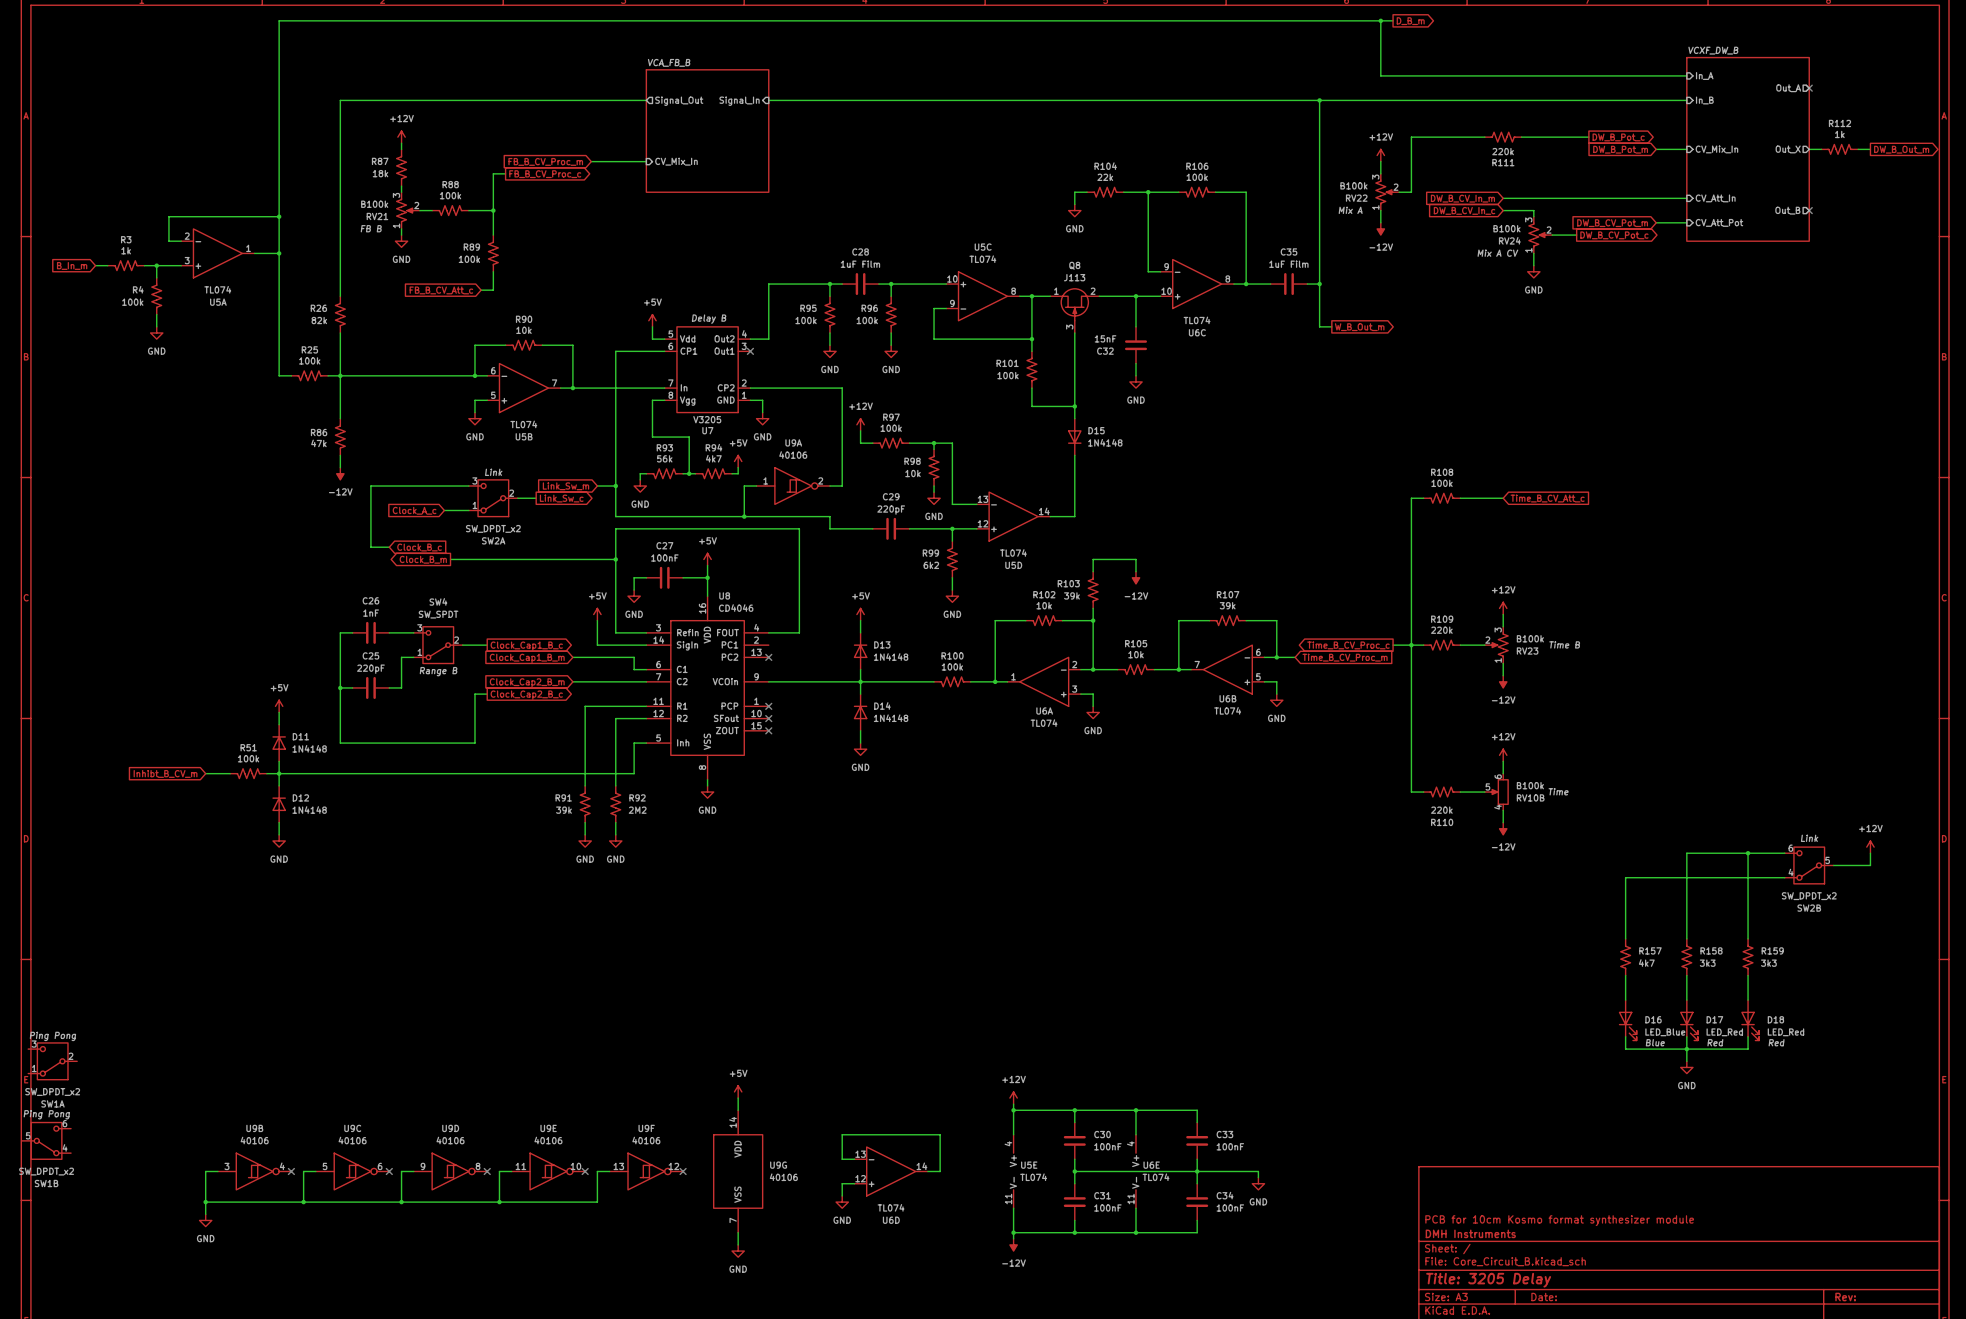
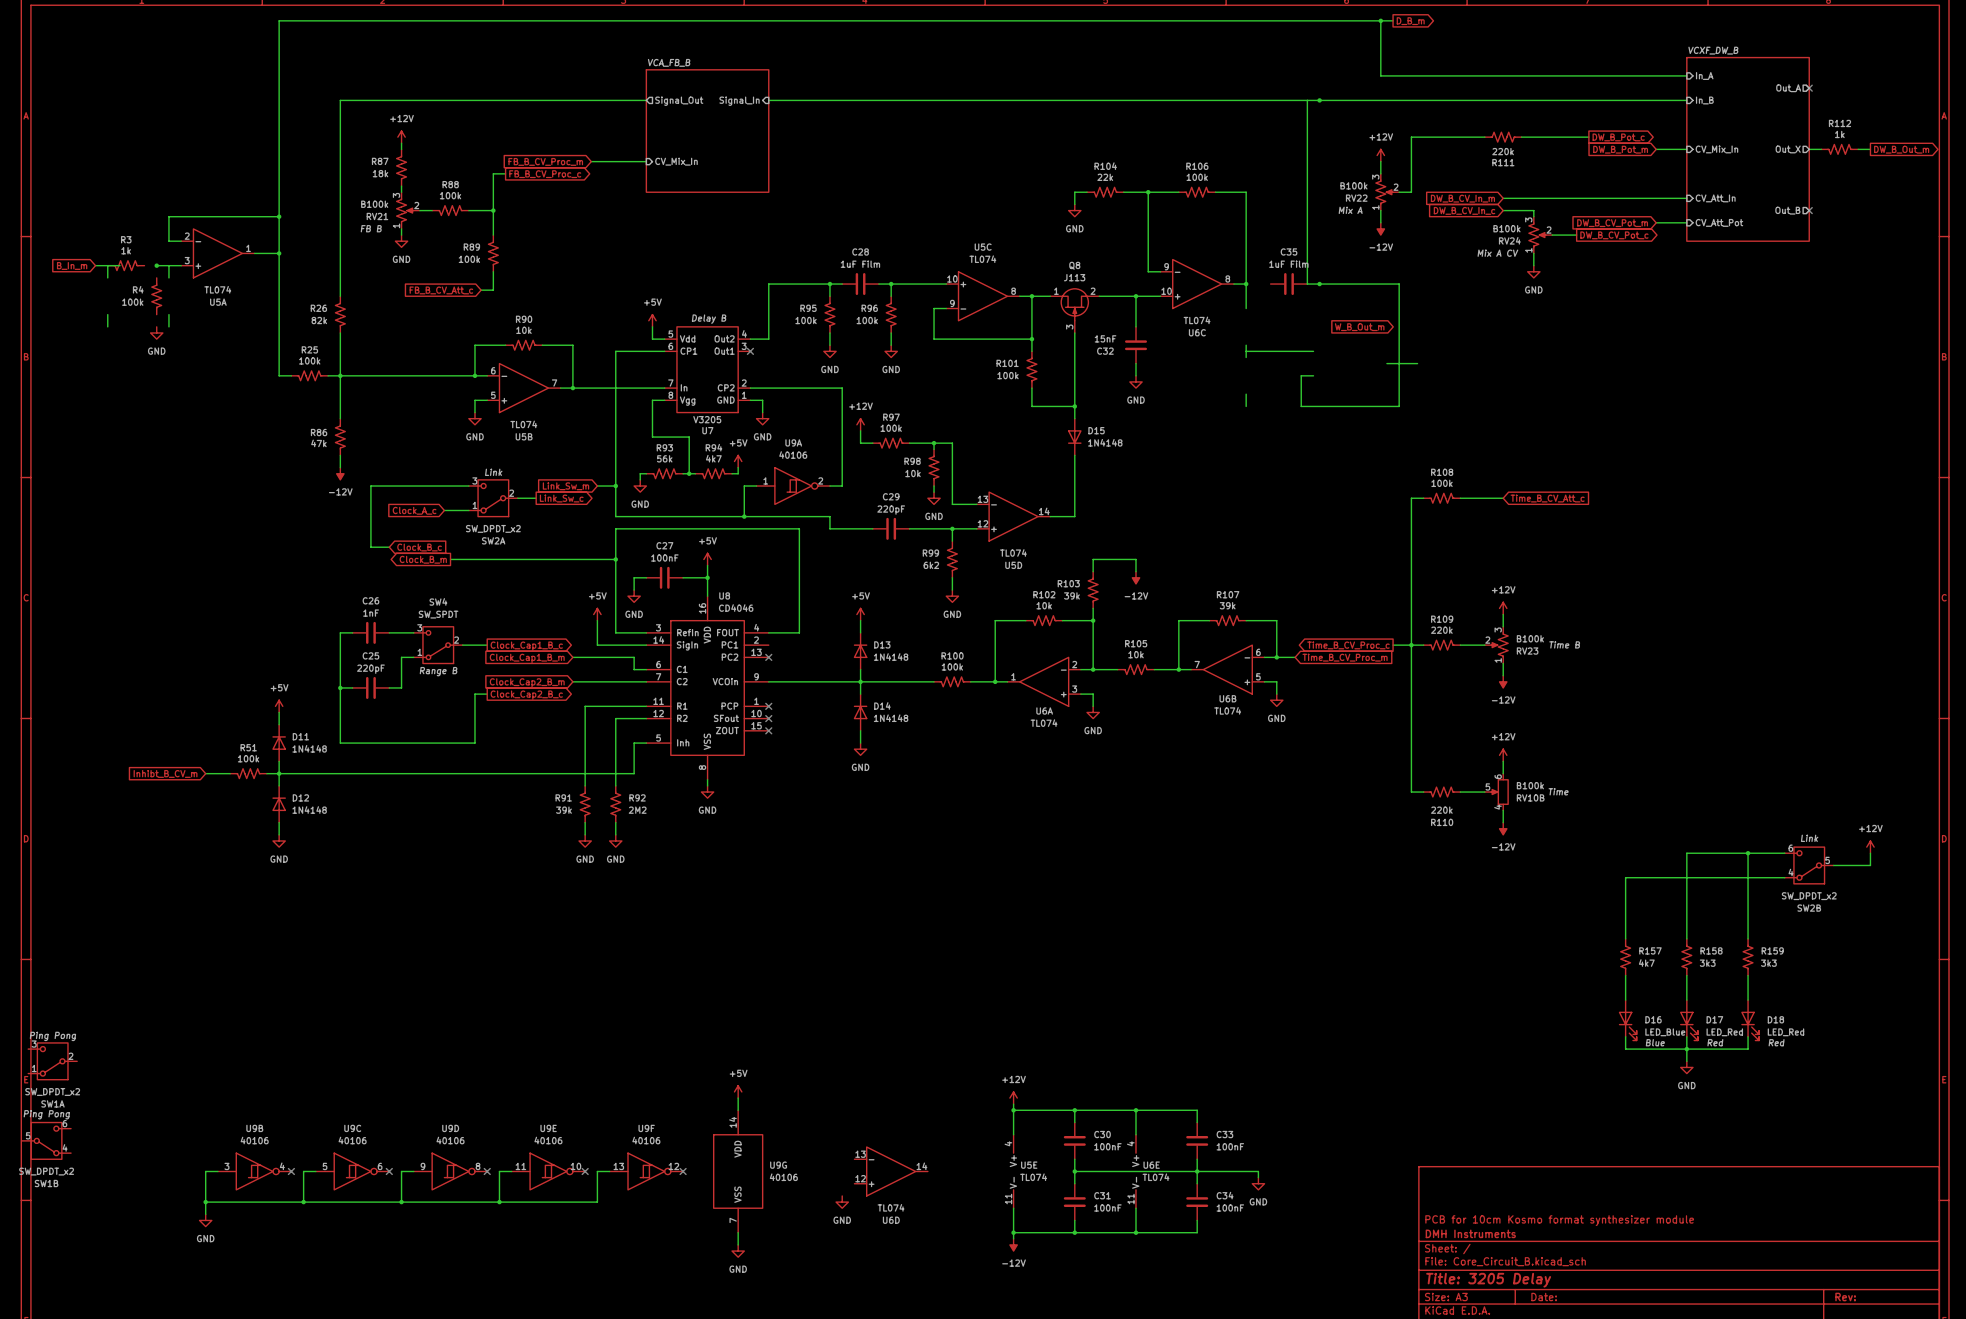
wire: none -> (1307, 100) (1307, 284)
wire: (1319, 100) (1319, 326) (1331, 326) -> none
wire: none -> (120, 265) (107, 265) (107, 277)
wire: (144, 265) (156, 265) (156, 277) -> none
wire: none -> (168, 265) (168, 277)
wire: (1246, 284) (1270, 284) -> (1246, 284) (1246, 308)
wire: none -> (1319, 284) (1399, 284) (1399, 406) (1301, 406) (1301, 375) (1313, 375)
wire: none -> (107, 314) (107, 326)
wire: (156, 314) (156, 326) -> (168, 314) (168, 326)
wire: none -> (1246, 345) (1246, 357)
wire: none -> (1246, 351) (1313, 351)
wire: none -> (1386, 363) (1417, 363)
wire: none -> (1246, 394) (1246, 406)
wire: (854, 1159) (842, 1159) (842, 1134) (940, 1134) (940, 1171) (927, 1171) -> none
wire: (854, 1183) (842, 1183) (842, 1195) -> none

